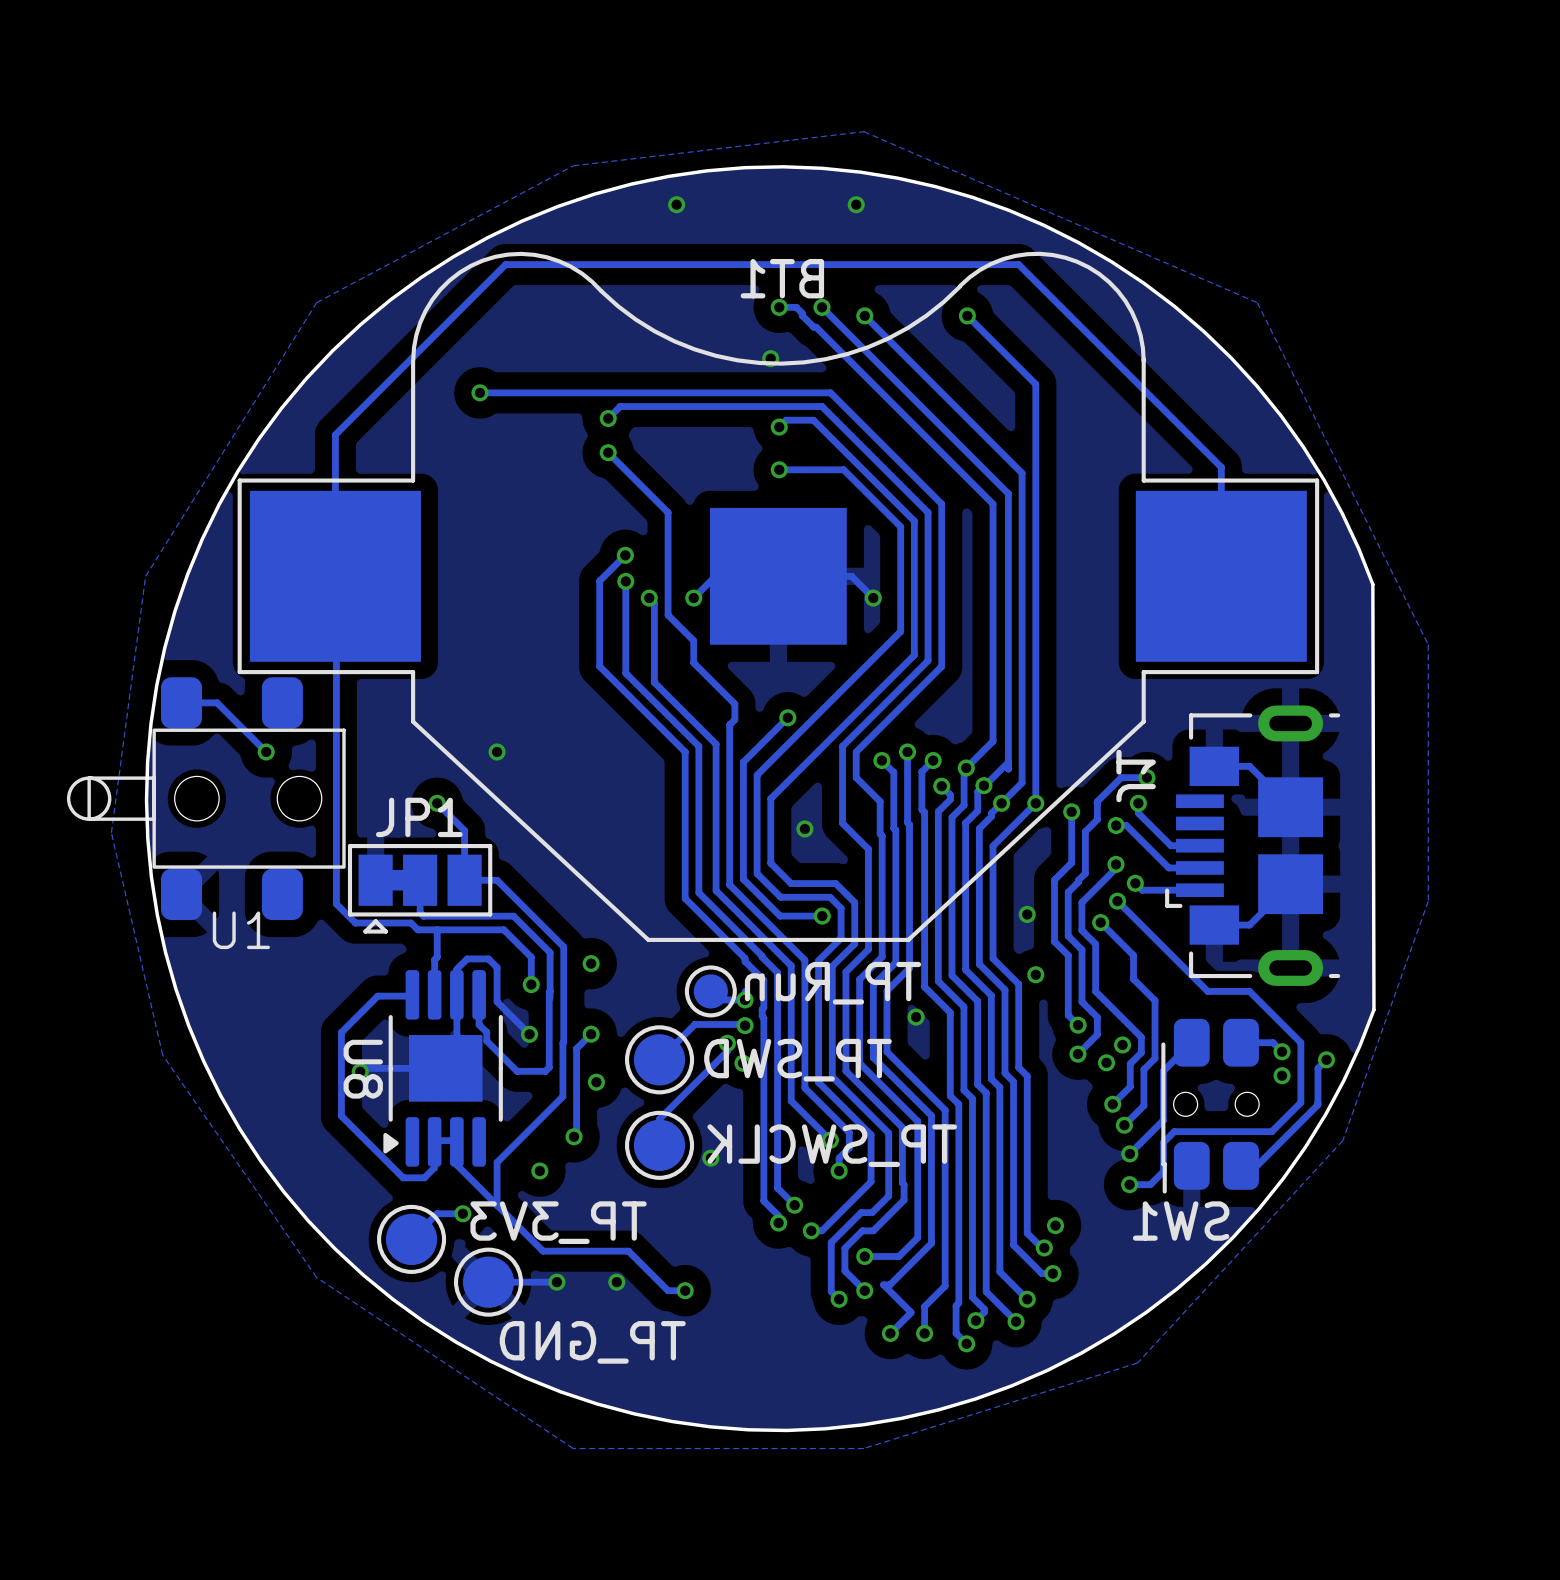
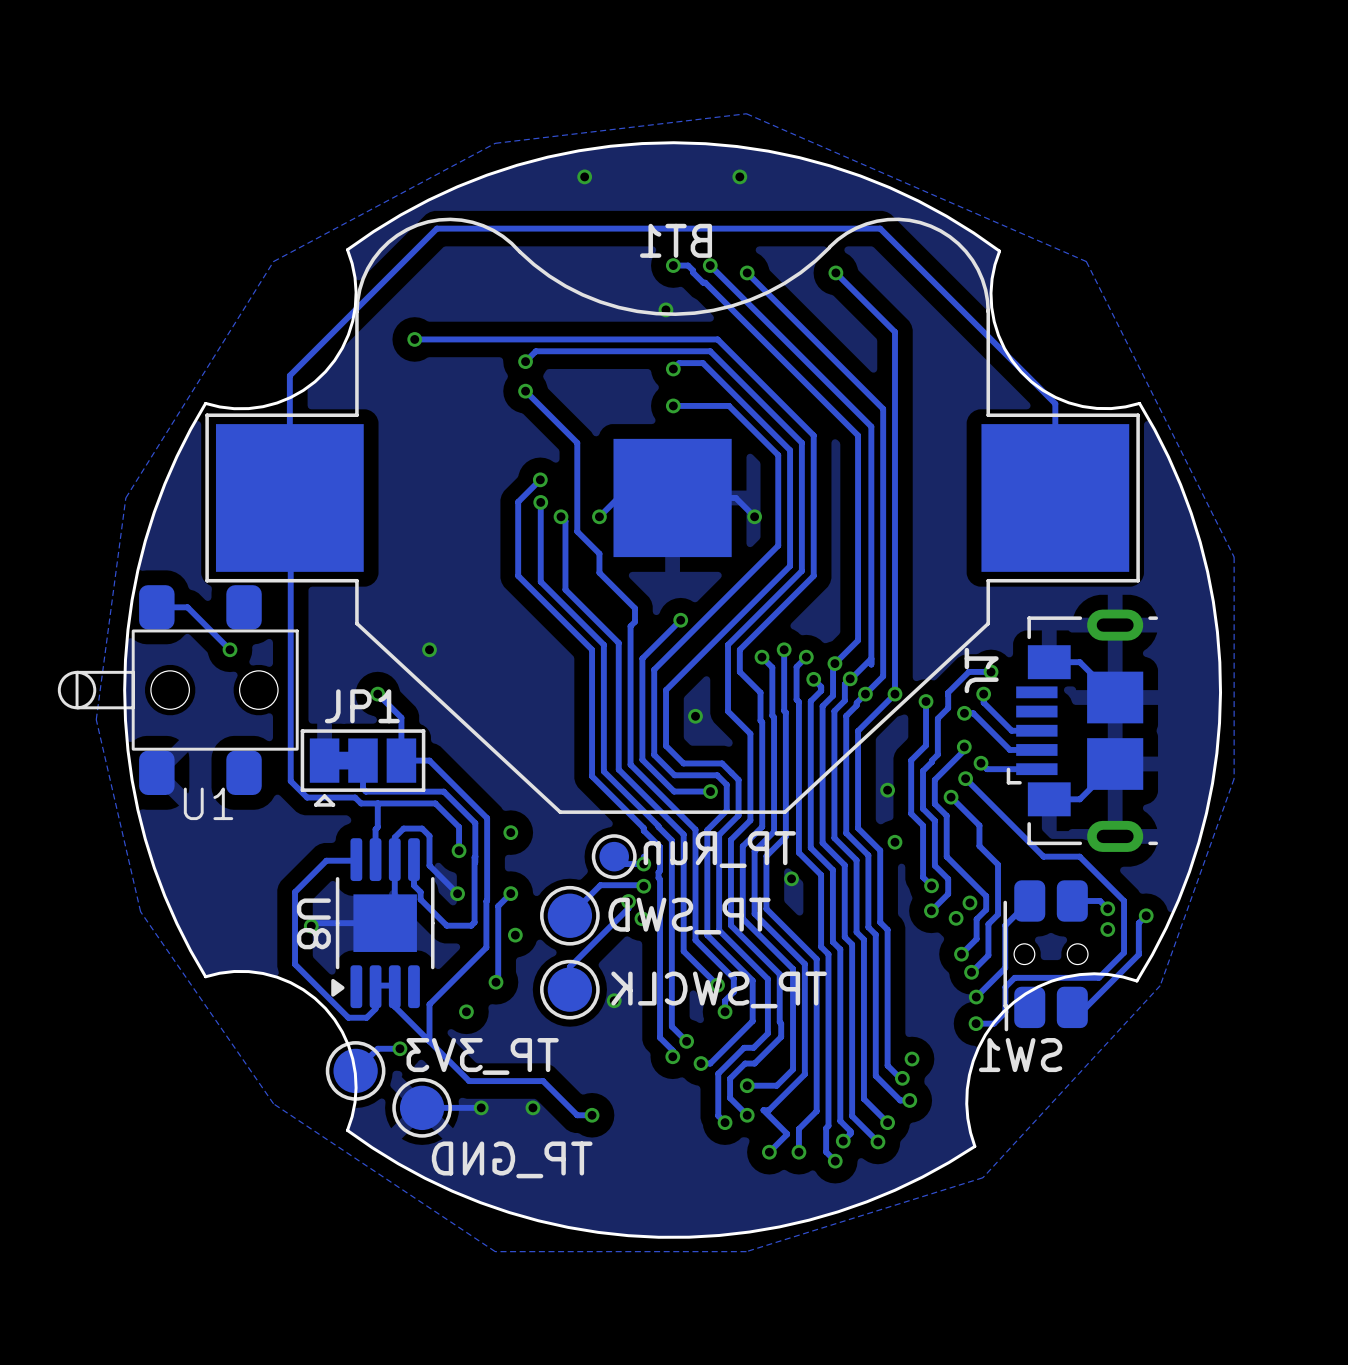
board edge: (1372, 584) (1373, 1009) (1360, 1045) (1343, 1080) (1305, 1147) (1259, 1208) (1206, 1263) (1146, 1312) (1114, 1333) (1081, 1353) (1011, 1385) (938, 1409) (863, 1424) (786, 1430) (748, 1429) (672, 1421) (634, 1413) (560, 1391) (525, 1377) (456, 1342) (393, 1299) (363, 1275) (308, 1221) (283, 1191) (239, 1128) (203, 1061) (188, 1025) (165, 952) (151, 876) (146, 800) (147, 761) (151, 723) (164, 648) (175, 610) (202, 539) (238, 471) (258, 438) (306, 378) (360, 324) (390, 299) (453, 256) (522, 221) (557, 206) (594, 194) (668, 176) (706, 170) (783, 166) (860, 172) (898, 178) (972, 197) (1044, 225) (1111, 261) (1143, 283) (1203, 331) (1257, 386) (1303, 447) (1324, 480) (1342, 513) (1372, 584) -> (347, 249) (400, 215) (457, 186) (487, 175) (547, 157) (610, 146) (673, 142) (705, 143) (768, 151) (830, 165) (889, 187) (946, 216) (973, 232) (999, 251) (992, 278) (990, 293) (994, 321) (1004, 348) (1021, 371) (1031, 381) (1055, 397) (1082, 406) (1111, 408) (1139, 403) (1168, 456) (1191, 513) (1200, 542) (1213, 601) (1219, 662) (1219, 722) (1212, 783) (1206, 813) (1198, 842) (1178, 900) (1152, 954) (1136, 981) (1108, 974) (1079, 974) (1065, 977) (1038, 986) (1025, 993) (1013, 1002) (993, 1023) (978, 1047) (969, 1075) (966, 1103) (967, 1118) (974, 1146) (922, 1177) (866, 1201) (838, 1211) (779, 1226) (719, 1235) (658, 1237) (598, 1232) (568, 1227) (509, 1212) (452, 1191) (424, 1178) (372, 1147) (347, 1130) (355, 1102) (355, 1073) (352, 1059) (342, 1032) (325, 1008) (303, 989) (277, 977) (248, 971) (234, 971) (205, 976) (190, 950) (164, 896) (145, 839) (137, 809) (127, 750) (125, 720) (125, 659) (132, 599) (145, 541) (154, 512) (176, 456) (205, 403) (219, 406) (248, 408) (263, 406) (290, 397) (315, 381) (325, 371) (342, 348) (352, 321) (356, 292) (352, 263) (347, 249)

